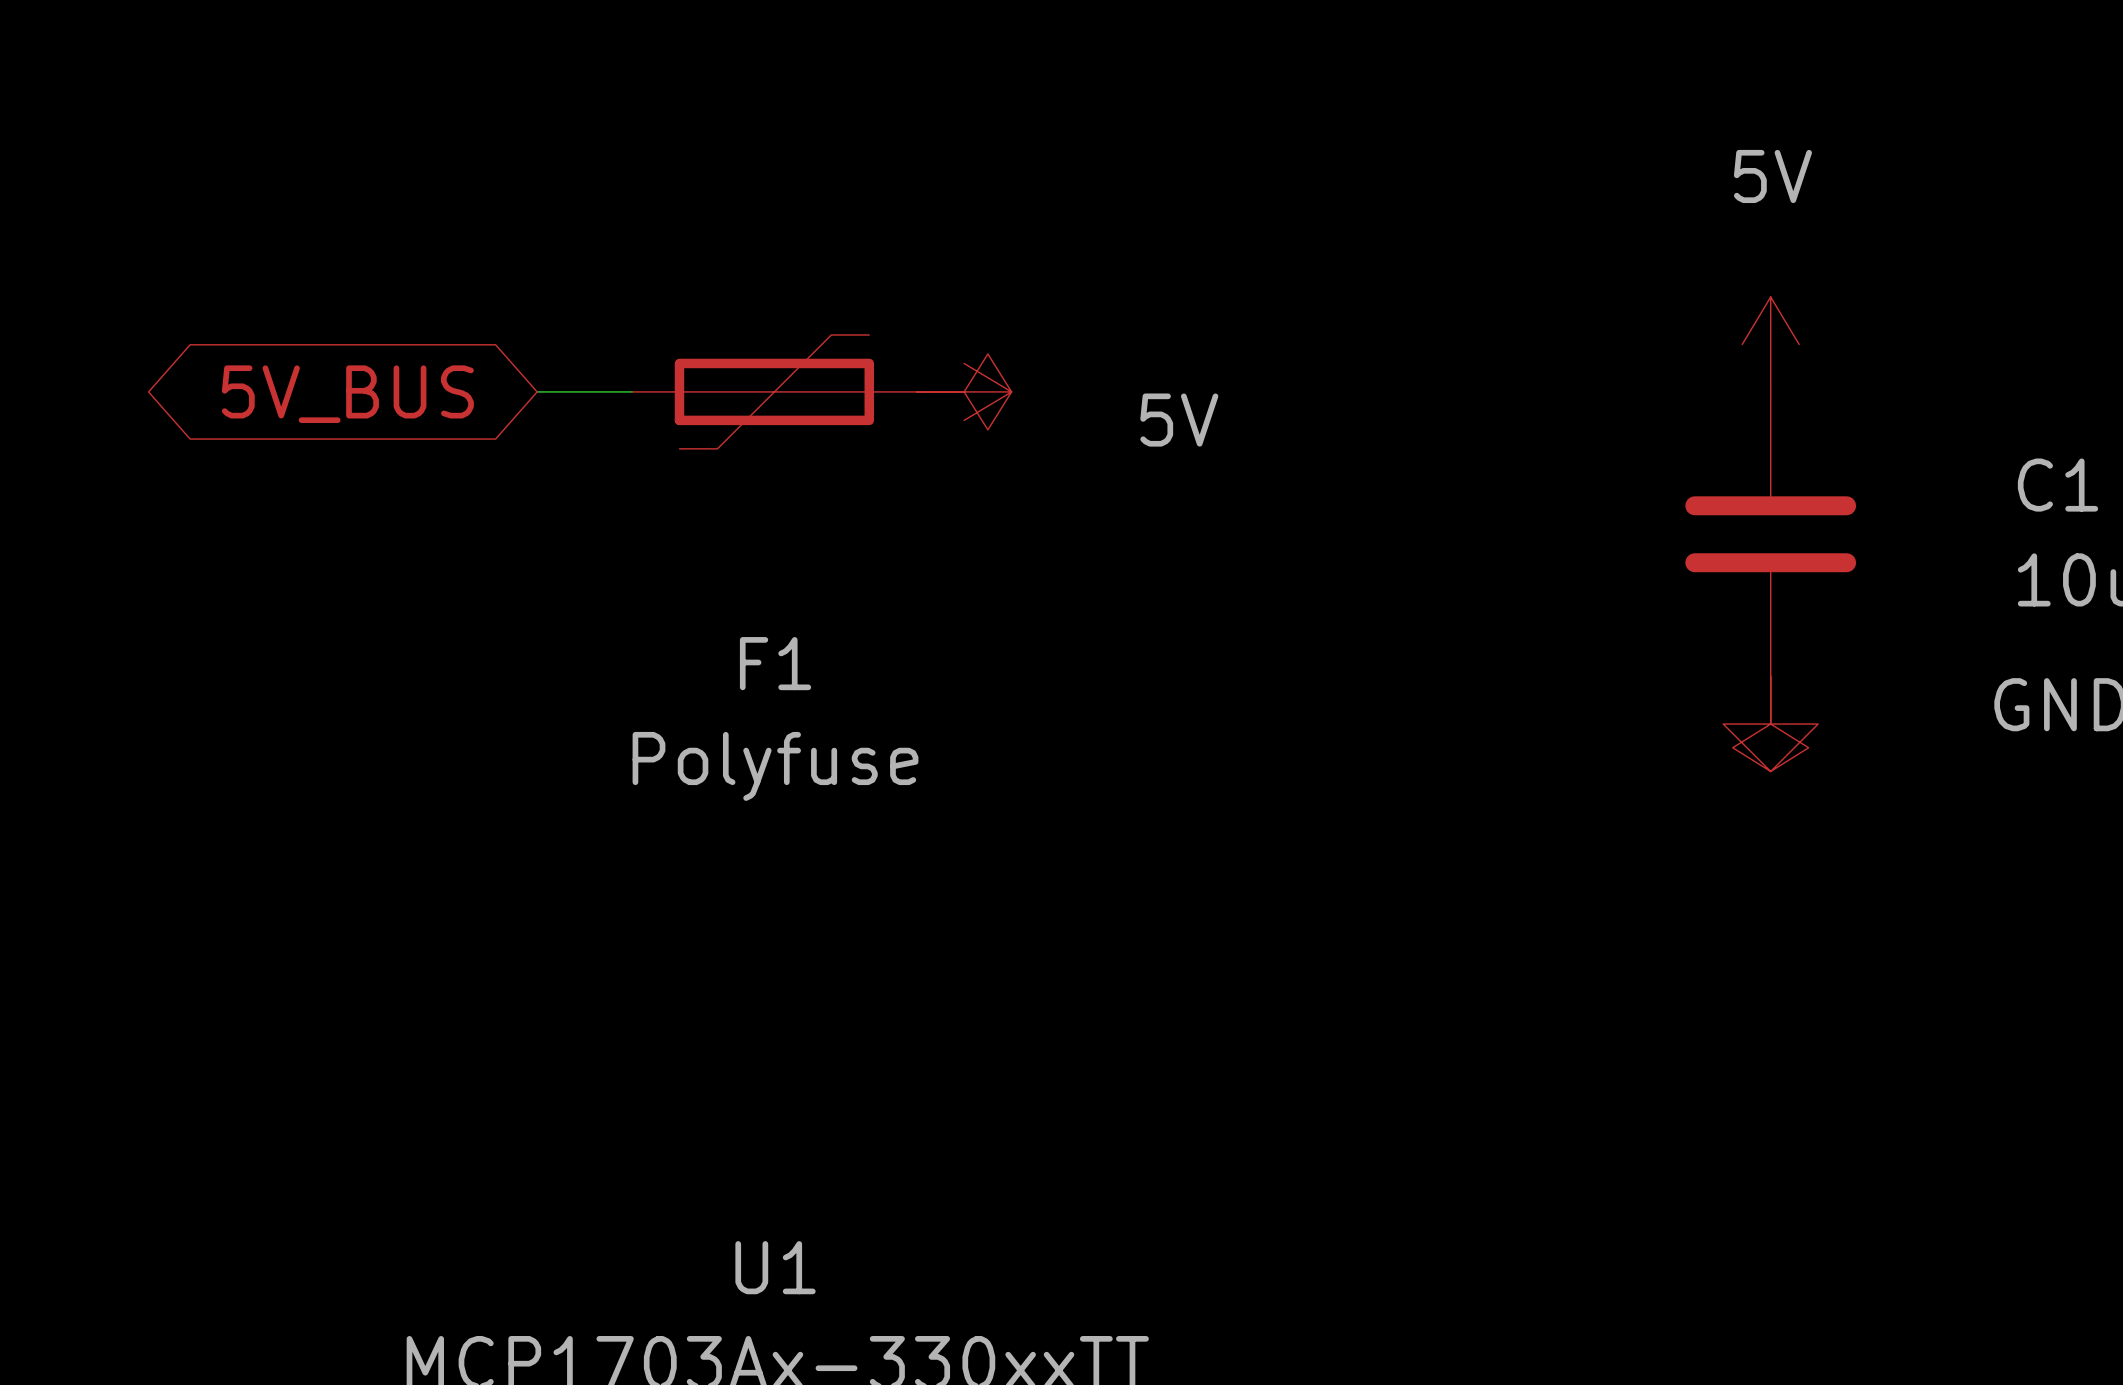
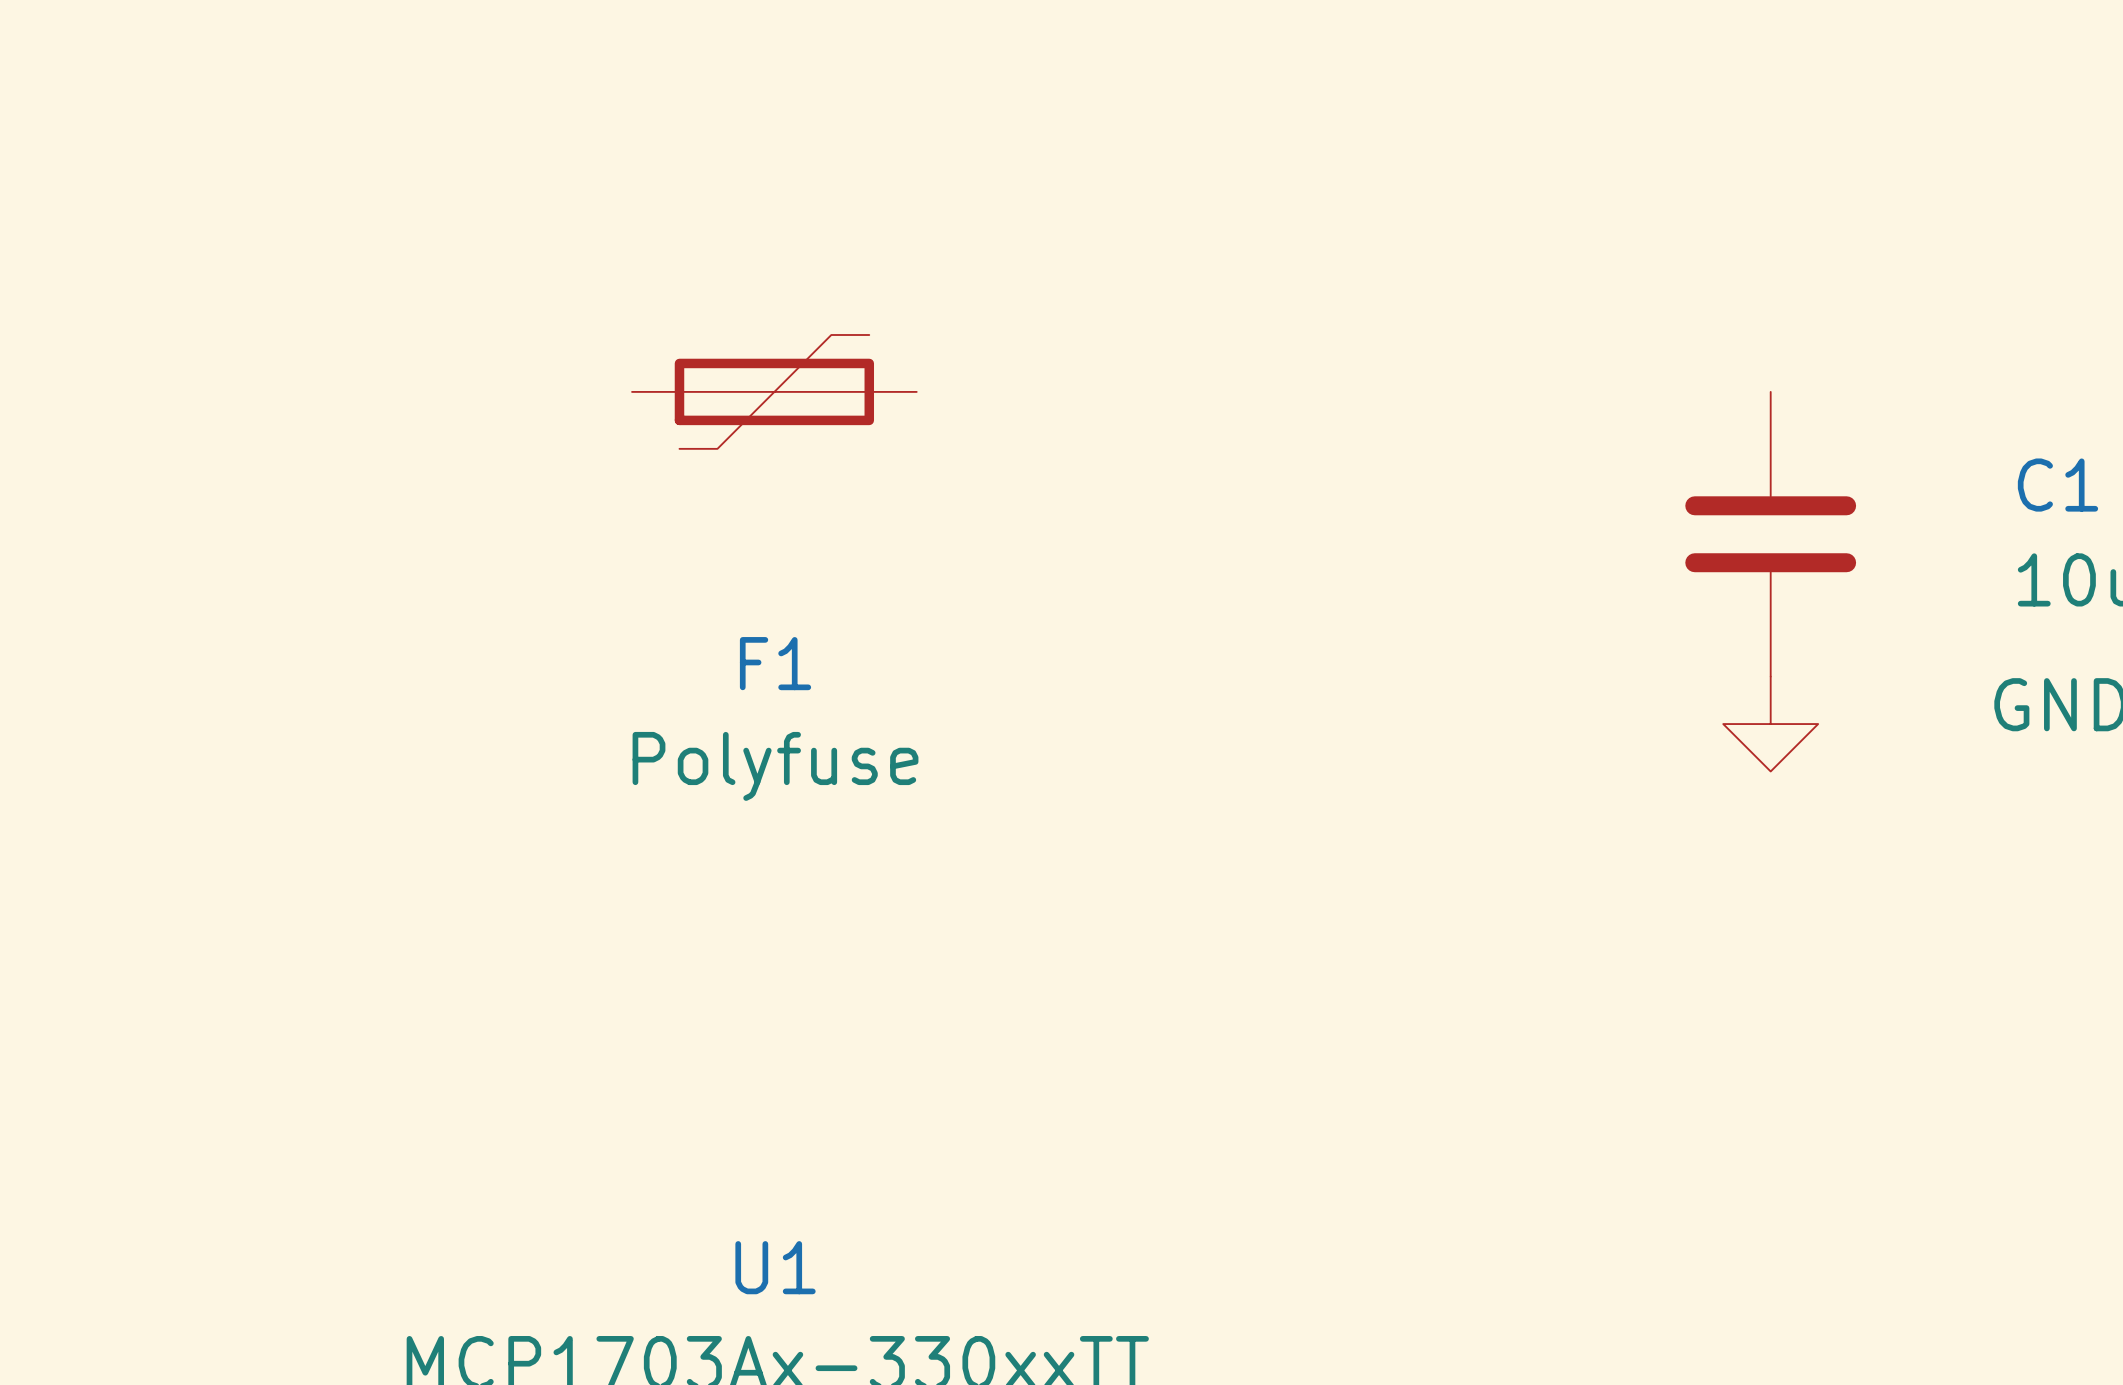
power symbol: 5V (1770, 344) -> none
wire: (537, 391) (632, 391) -> none
power symbol: (964, 391) -> none
power symbol: 5V (964, 391) -> none
global label: 5V_BUS (347, 394) -> none
power symbol: (1770, 724) -> none

